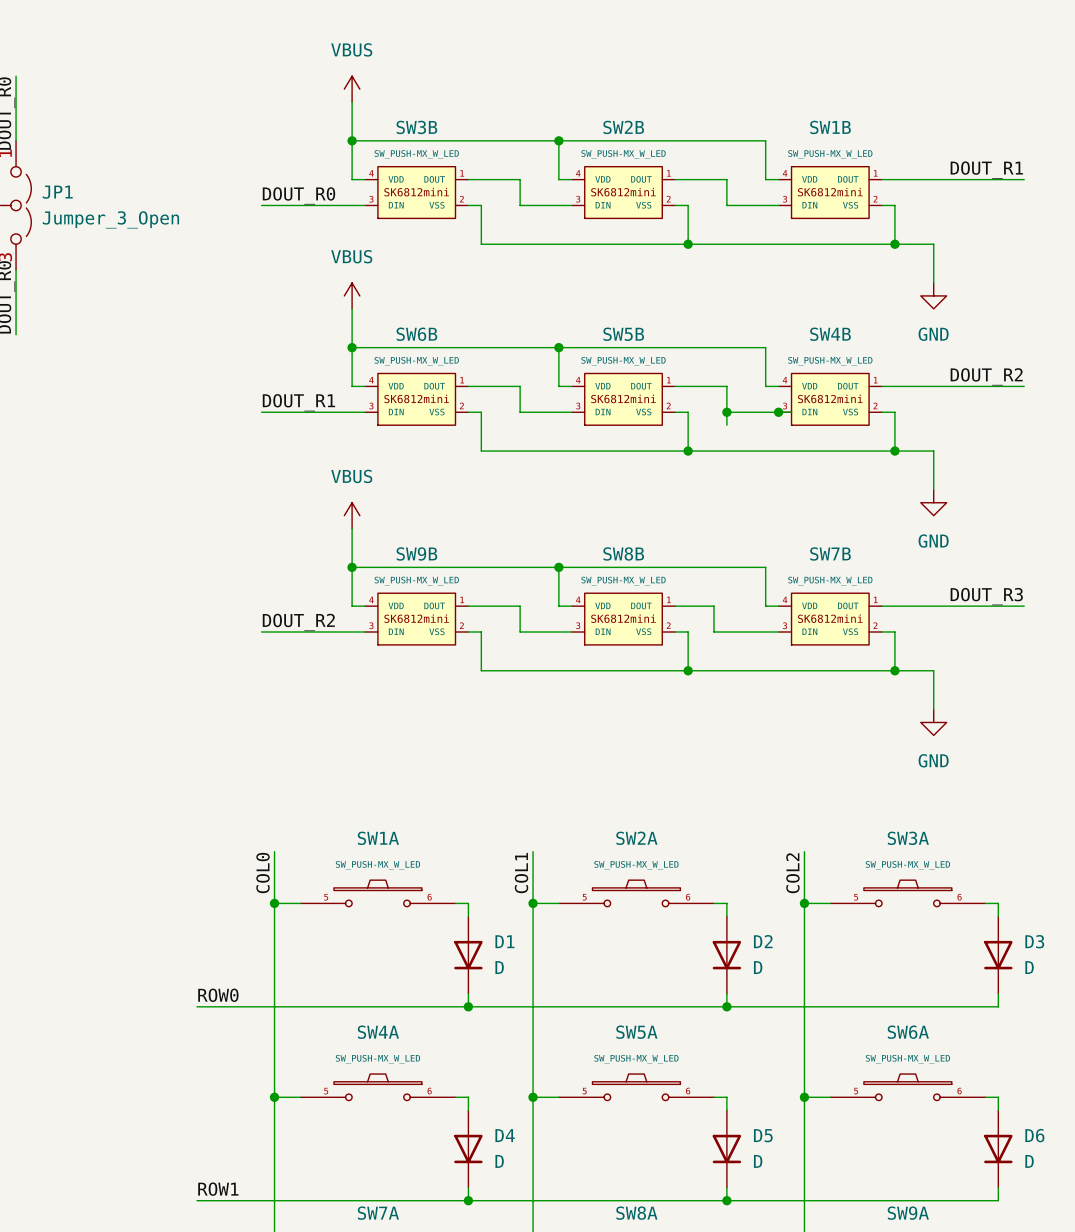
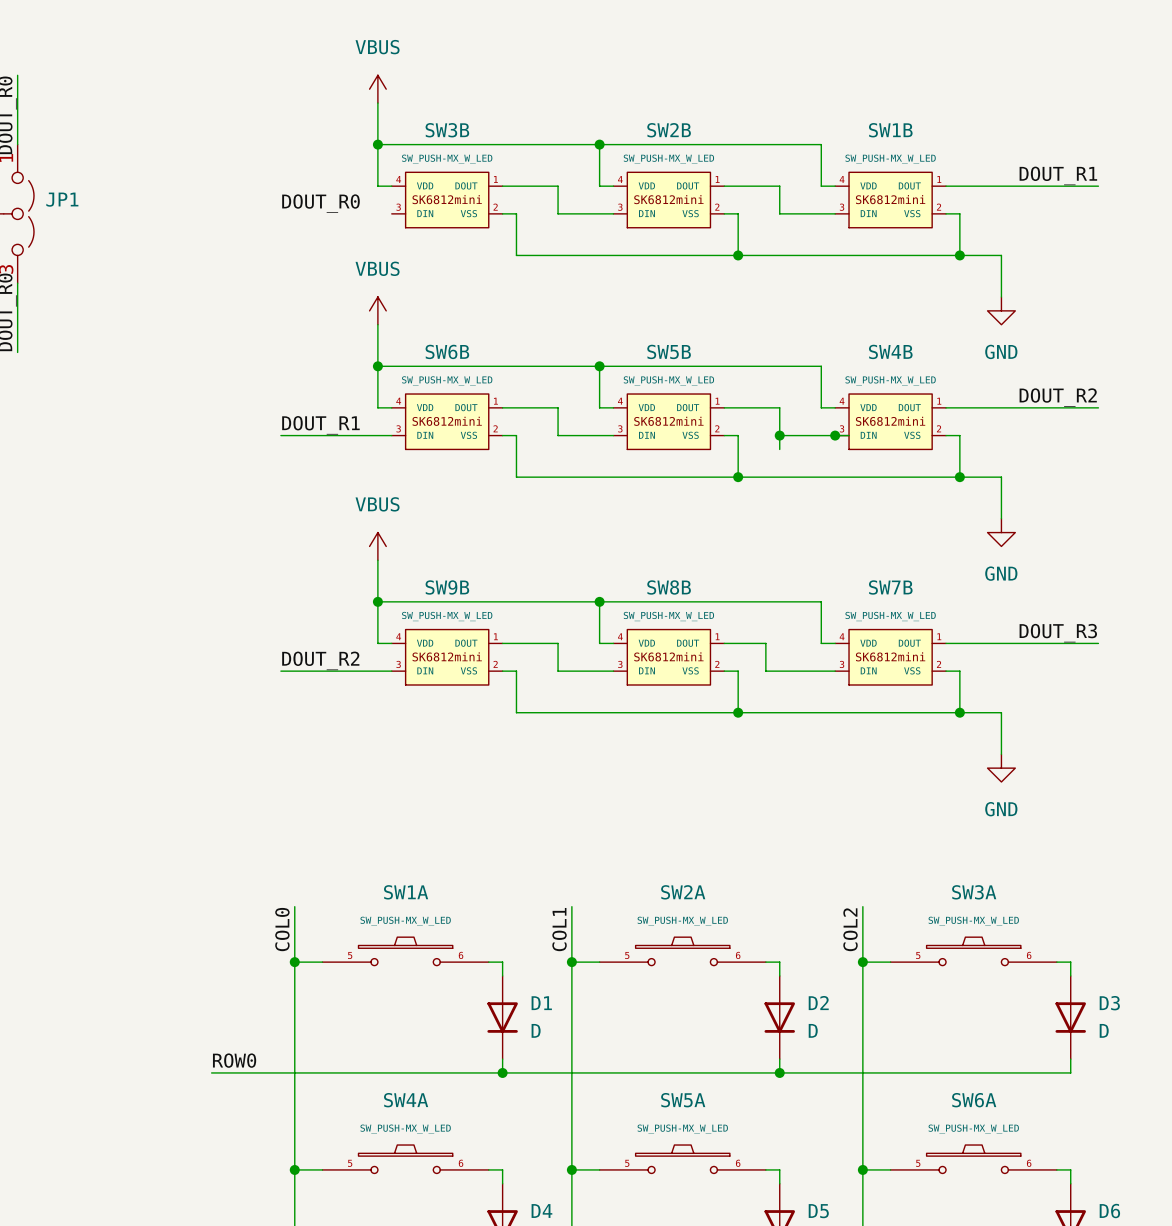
wire: (261, 205) (365, 205) -> none
JP1 value: Jumper_3_Open (110, 219) -> none

